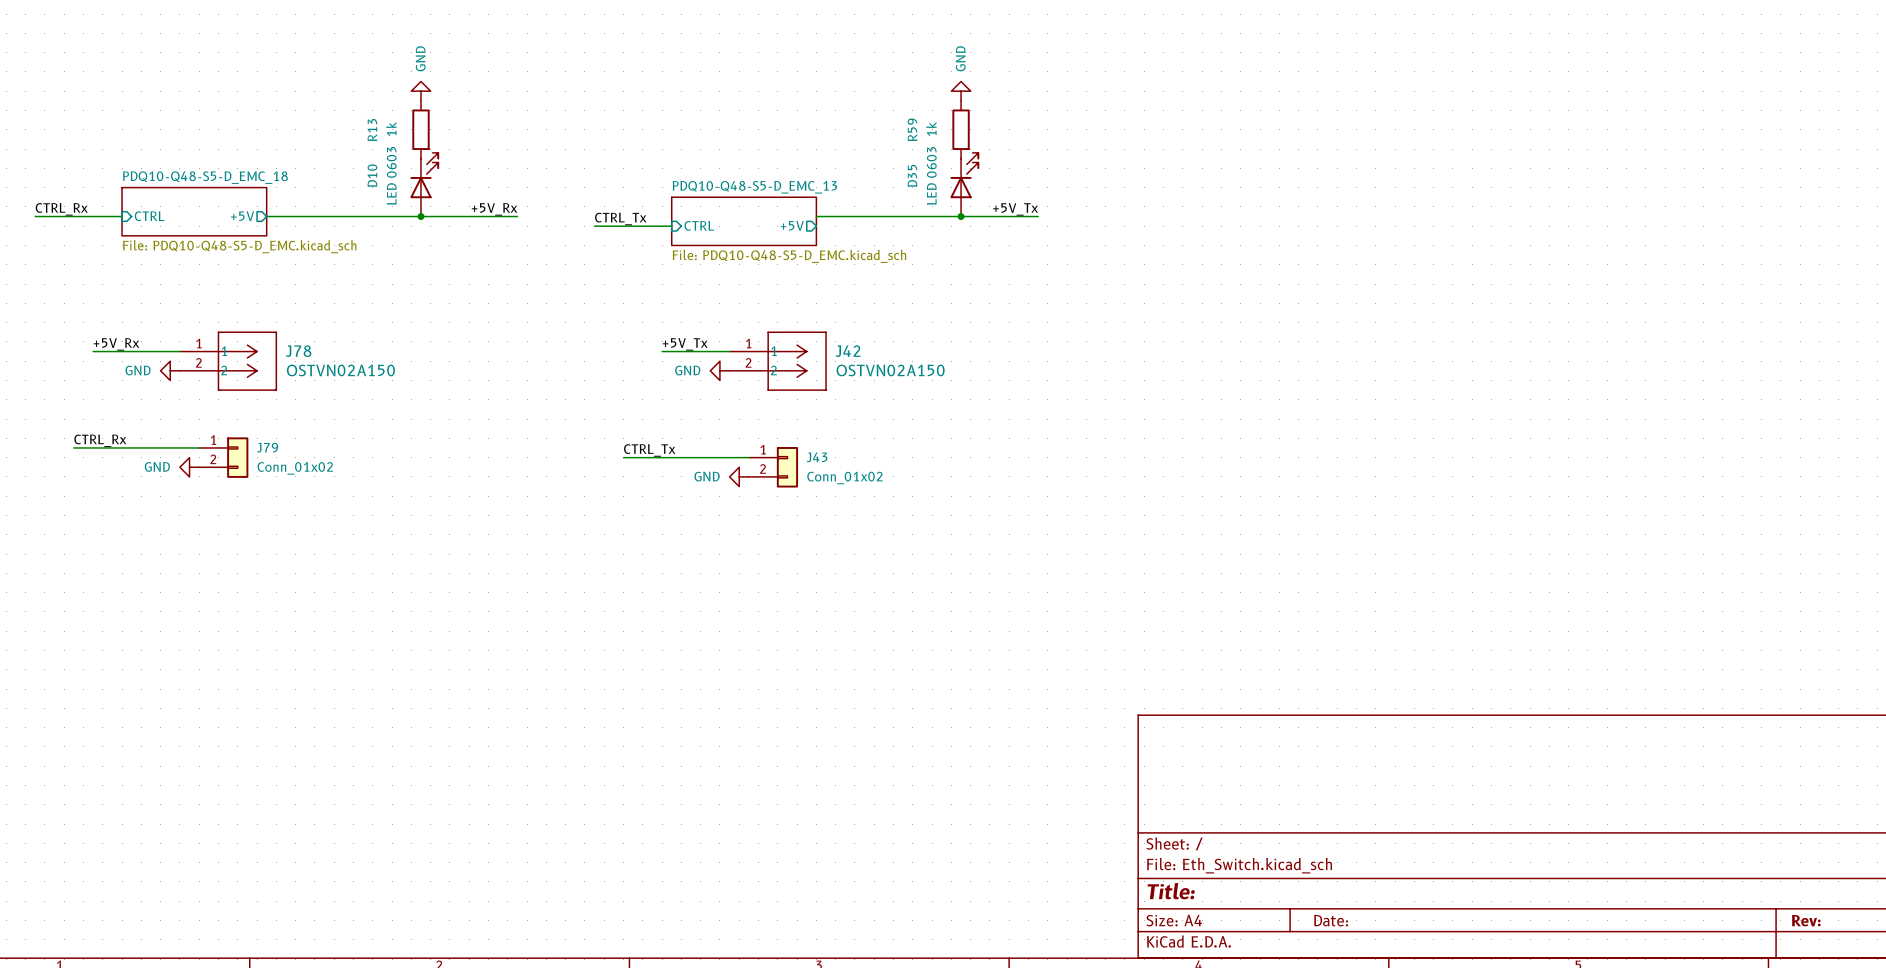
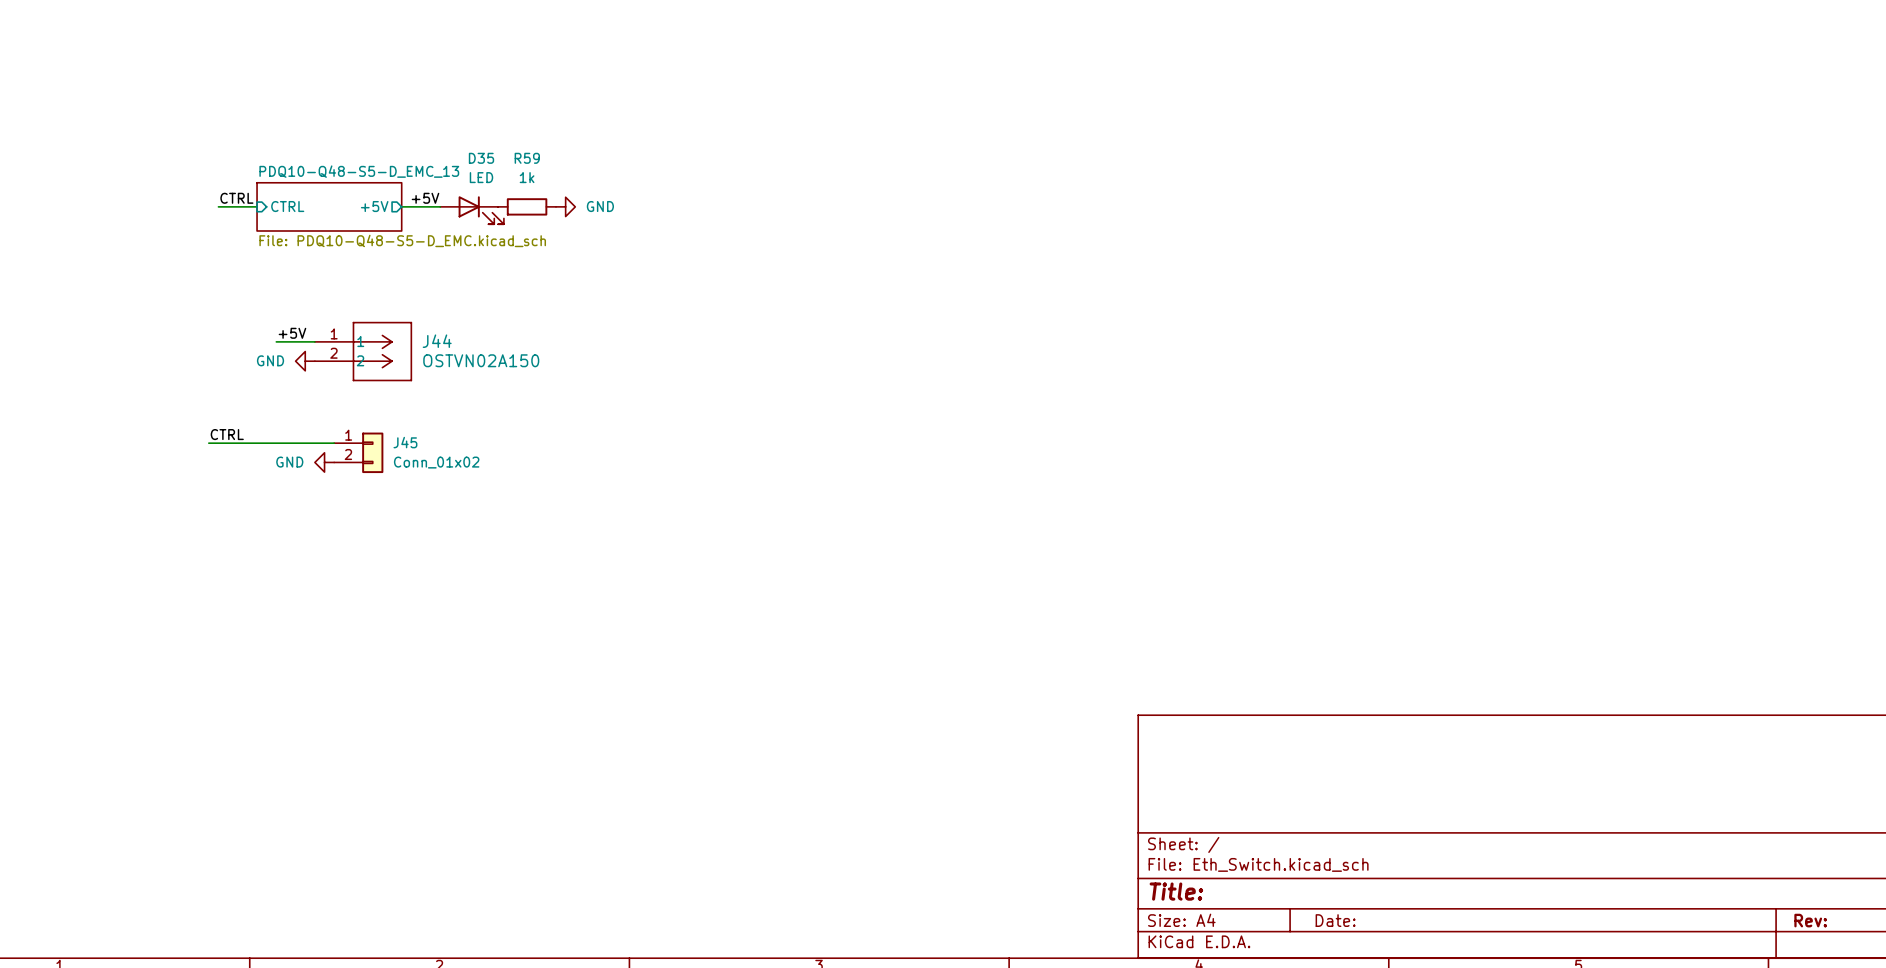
power symbol: GND (420, 91) -> none
power symbol: GND (961, 91) -> none
R13: 1k (420, 129) -> none
R59 rotation: 0° (961, 129) -> 90° clockwise (527, 206)
R59 position: (961, 129) -> (527, 206)
D35 value: LED 0603 (931, 175) -> LED (481, 177)
D35 rotation: 0° (964, 175) -> 90° clockwise (481, 210)
D10: LED 0603 (424, 184) -> none
D35 position: (964, 184) -> (472, 210)
label: none -> CTRL (236, 198)
label: none -> +5V (425, 198)
wire: none -> (218, 206) (257, 206)
wire: none -> (401, 206) (440, 206)
power symbol: none -> GND (565, 206)
label: CTRL_Rx (61, 209) -> none
label: +5V_Rx (494, 209) -> none
label: +5V_Tx (1015, 209) -> none
sheet PDQ10-Q48-S5-D_EMC_18: File: PDQ10-Q48-S5-D_EMC.kicad_sch (194, 211) -> none
wire: (35, 216) (122, 216) -> none
sheet pin position: CTRL (149, 216) -> CTRL (287, 206)
sheet pin position: +5V (242, 216) -> +5V (374, 206)
wire: (266, 216) (517, 216) -> none
junction: (420, 216) -> none
wire: (816, 216) (1038, 216) -> none
junction: (961, 216) -> none
label: CTRL_Tx (620, 219) -> none
sheet PDQ10-Q48-S5-D_EMC_13 position: (744, 221) -> (329, 206)
sheet pin: CTRL (699, 225) -> none
sheet pin: +5V (792, 225) -> none
wire: (594, 226) (671, 226) -> none
label: none -> +5V (292, 333)
wire: none -> (276, 341) (314, 341)
label: +5V_Rx (116, 344) -> none
label: +5V_Tx (685, 344) -> none
wire: (93, 351) (179, 351) -> none
J44: none -> OSTVN02A150 (363, 351)
wire: (662, 351) (729, 351) -> none
J78: OSTVN02A150 (228, 361) -> none
power symbol: none -> GND (305, 361)
J42: OSTVN02A150 (778, 361) -> none
power symbol: GND (170, 370) -> none
power symbol: GND (719, 370) -> none
label: none -> CTRL (227, 434)
label: CTRL_Rx (100, 440) -> none
wire: (73, 447) (199, 447) -> (208, 443) (334, 443)
label: CTRL_Tx (649, 450) -> none
J45: none -> Conn_01x02 (358, 452)
J79: Conn_01x02 (223, 457) -> none
wire: (623, 457) (748, 457) -> none
power symbol: none -> GND (324, 462)
power symbol: GND (189, 467) -> none
J43: Conn_01x02 (773, 467) -> none
power symbol: GND (739, 476) -> none

